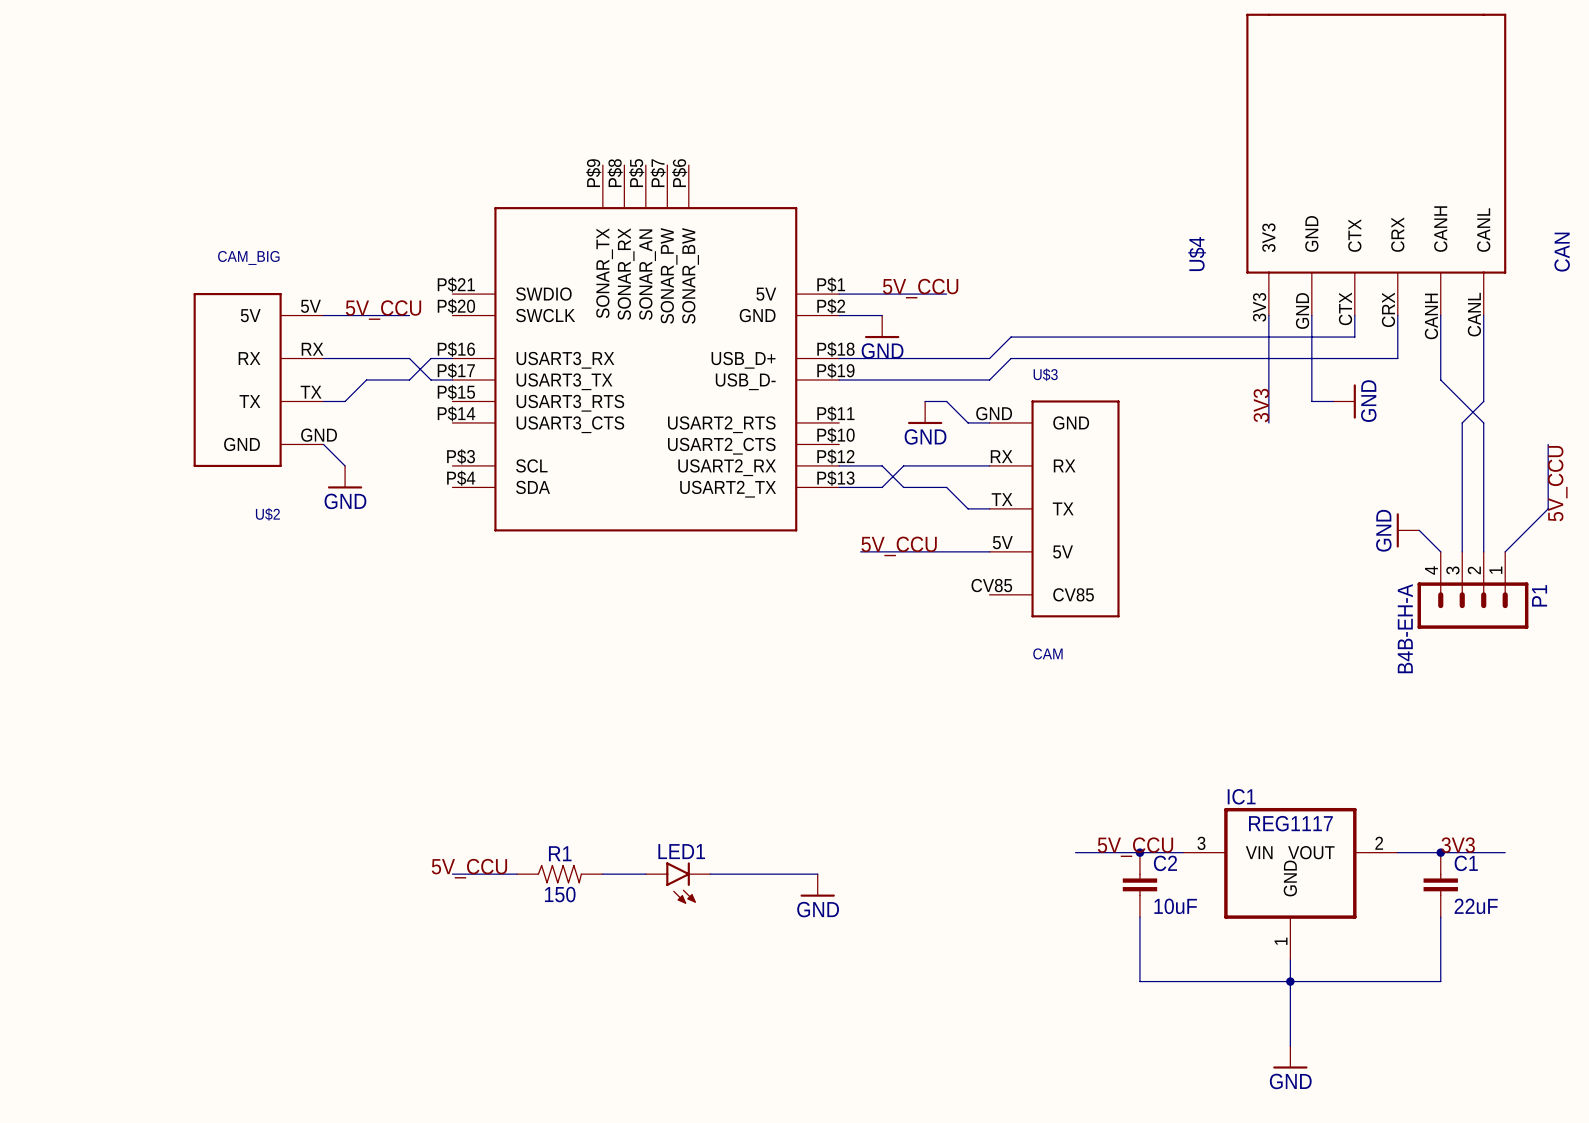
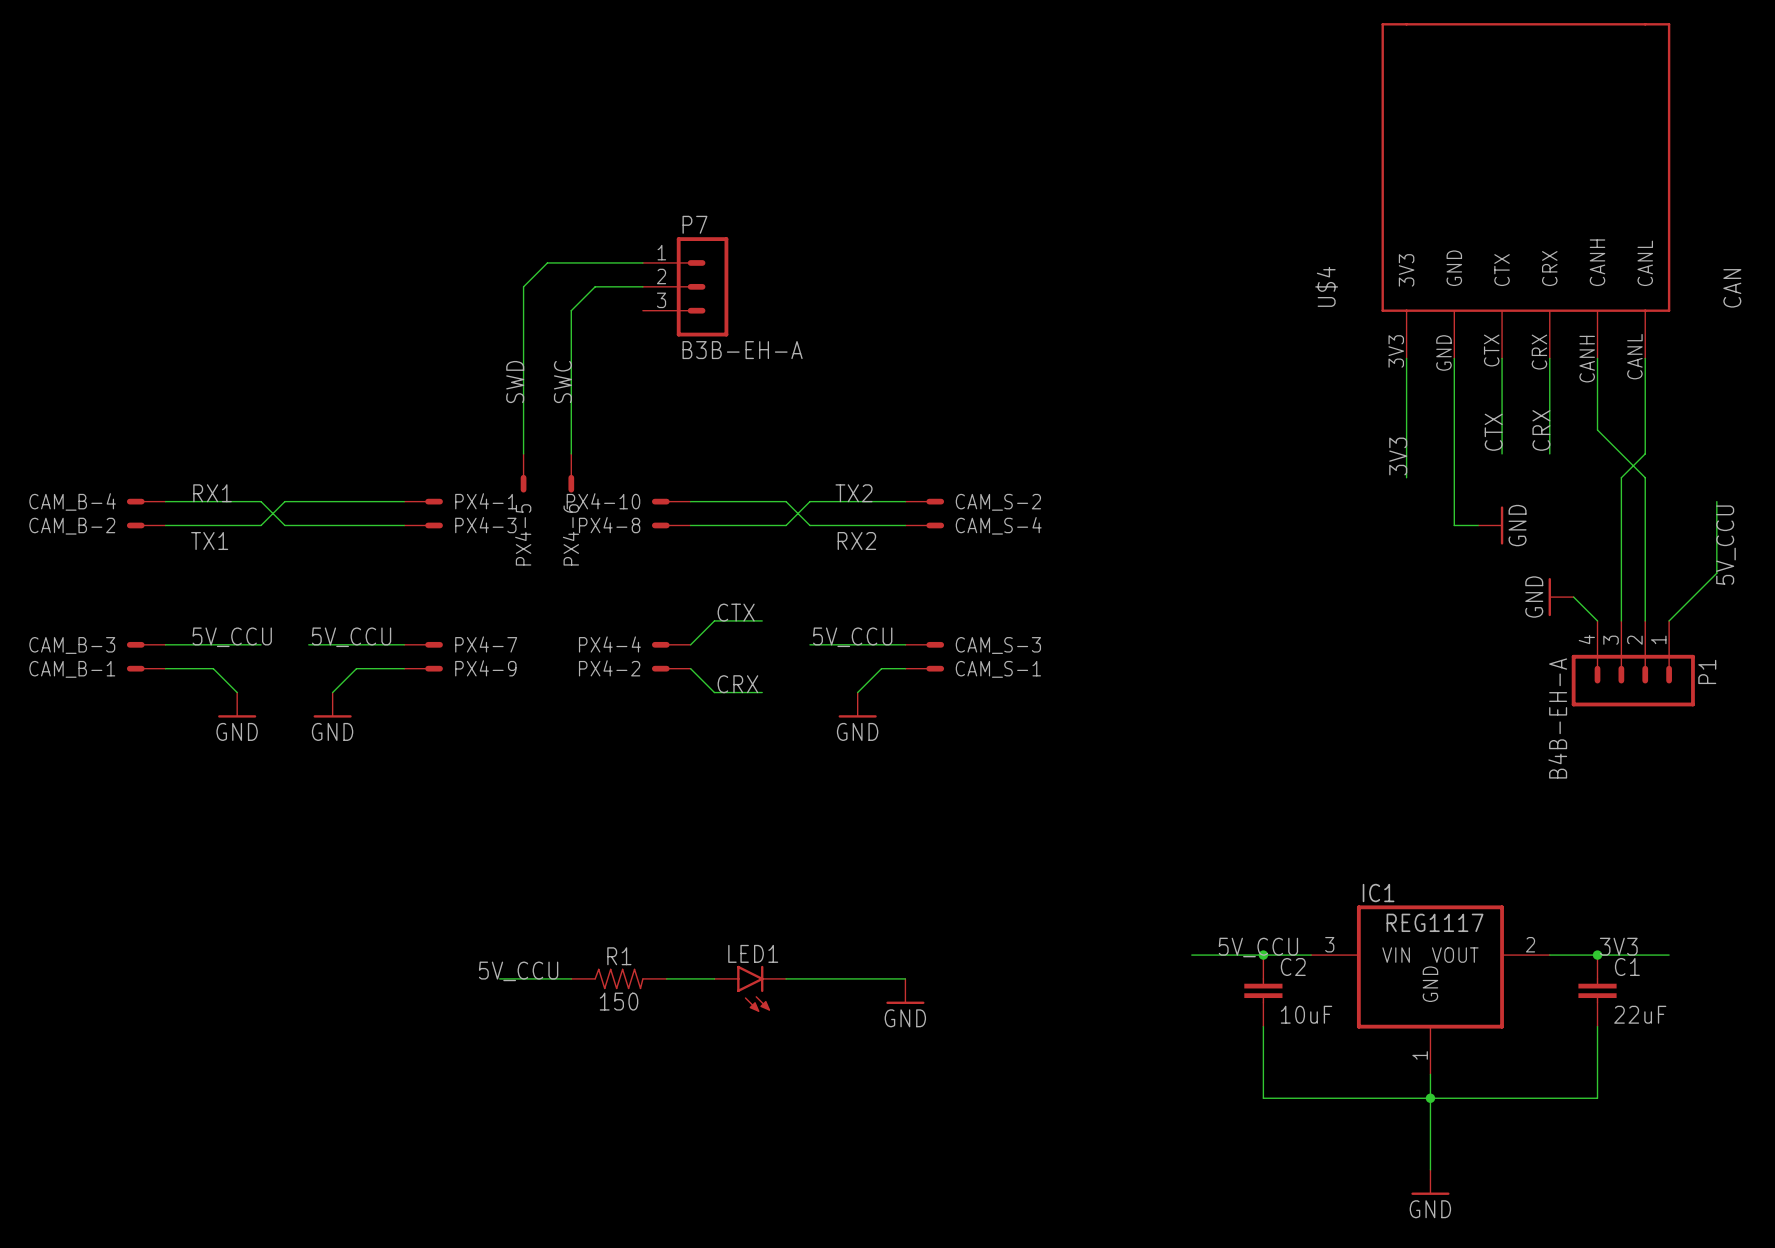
wire: none -> (642, 262) (547, 262) (523, 286) (523, 453)
wire: none -> (642, 286) (595, 286) (571, 310) (571, 453)
P7: none -> B3B-EH-A (685, 286)
label: 5V_CCU (920, 288) -> none
wire: (839, 294) (946, 294) -> none
label: 5V_CCU (383, 310) -> none
wire: (323, 315) (409, 315) -> none
wire: (839, 315) (882, 315) -> none
power symbol: GND (882, 326) -> none
label: none -> SWD (515, 382)
label: none -> SWC (562, 382)
wire: (1354, 337) (1011, 337) (989, 358) (839, 358) -> (1502, 382) (1502, 453)
part: (645, 348) -> none
wire: (323, 358) (409, 358) (430, 380) (452, 380) -> none
wire: (452, 358) (430, 358) (409, 380) (366, 380) (345, 401) (323, 401) -> none
wire: (1397, 358) (1011, 358) (989, 380) (839, 380) -> (1549, 406) (1549, 453)
U$2: CAM_BIG (258, 380) -> none
label: none -> CRX (1541, 430)
label: none -> CTX (1493, 432)
wire: (925, 401) (946, 401) (968, 422) (989, 422) -> none
wire: (1311, 401) (1333, 401) -> (1454, 453) (1454, 525) (1478, 525)
power symbol position: GND (1344, 401) -> GND (1490, 525)
power symbol: GND (925, 412) -> none
PX4-5: none -> (523, 473)
PX4-6: none -> (571, 473)
label: none -> RX1 (212, 493)
label: none -> TX2 (854, 493)
CAM_B-4: none -> (146, 501)
wire: none -> (165, 501) (261, 501) (284, 525) (404, 525)
wire: (323, 444) (345, 465) -> none
wire: none -> (404, 501) (284, 501) (261, 525) (165, 525)
PX4-1: none -> (423, 501)
PX4-10: none -> (671, 501)
wire: none -> (690, 501) (786, 501) (809, 525) (905, 525)
wire: none -> (905, 501) (809, 501) (786, 525) (690, 525)
CAM_S-2: none -> (924, 501)
CAM_B-2: none -> (146, 525)
PX4-3: none -> (423, 525)
PX4-8: none -> (671, 525)
CAM_S-4: none -> (924, 525)
wire: (839, 465) (882, 465) (903, 487) (946, 487) (968, 508) (989, 508) -> none
wire: (989, 465) (903, 465) (882, 487) (839, 487) -> none
power symbol: GND (345, 477) -> none
label: none -> TX1 (209, 541)
label: none -> RX2 (856, 541)
U$3: CAM (1054, 508) -> none
label: none -> CTX (736, 612)
label position: 5V_CCU (899, 546) -> 5V_CCU (852, 637)
wire: none -> (762, 620) (714, 620) (690, 644)
wire: (860, 551) (989, 551) -> none
label: none -> 5V_CCU (232, 637)
label: none -> 5V_CCU (351, 637)
CAM_B-3: none -> (146, 644)
wire: none -> (165, 644) (261, 644)
wire: none -> (308, 644) (404, 644)
PX4-7: none -> (423, 644)
PX4-4: none -> (671, 644)
wire: none -> (809, 644) (905, 644)
CAM_S-3: none -> (924, 644)
CAM_B-1: none -> (146, 668)
wire: none -> (165, 668) (213, 668) (237, 692)
wire: none -> (404, 668) (356, 668) (332, 692)
PX4-9: none -> (423, 668)
PX4-2: none -> (671, 668)
wire: none -> (690, 668) (714, 692) (762, 692)
wire: none -> (905, 668) (881, 668) (857, 692)
CAM_S-1: none -> (924, 668)
label: none -> CRX (737, 684)
power symbol: none -> GND (237, 705)
power symbol: none -> GND (332, 705)
power symbol: none -> GND (857, 705)

